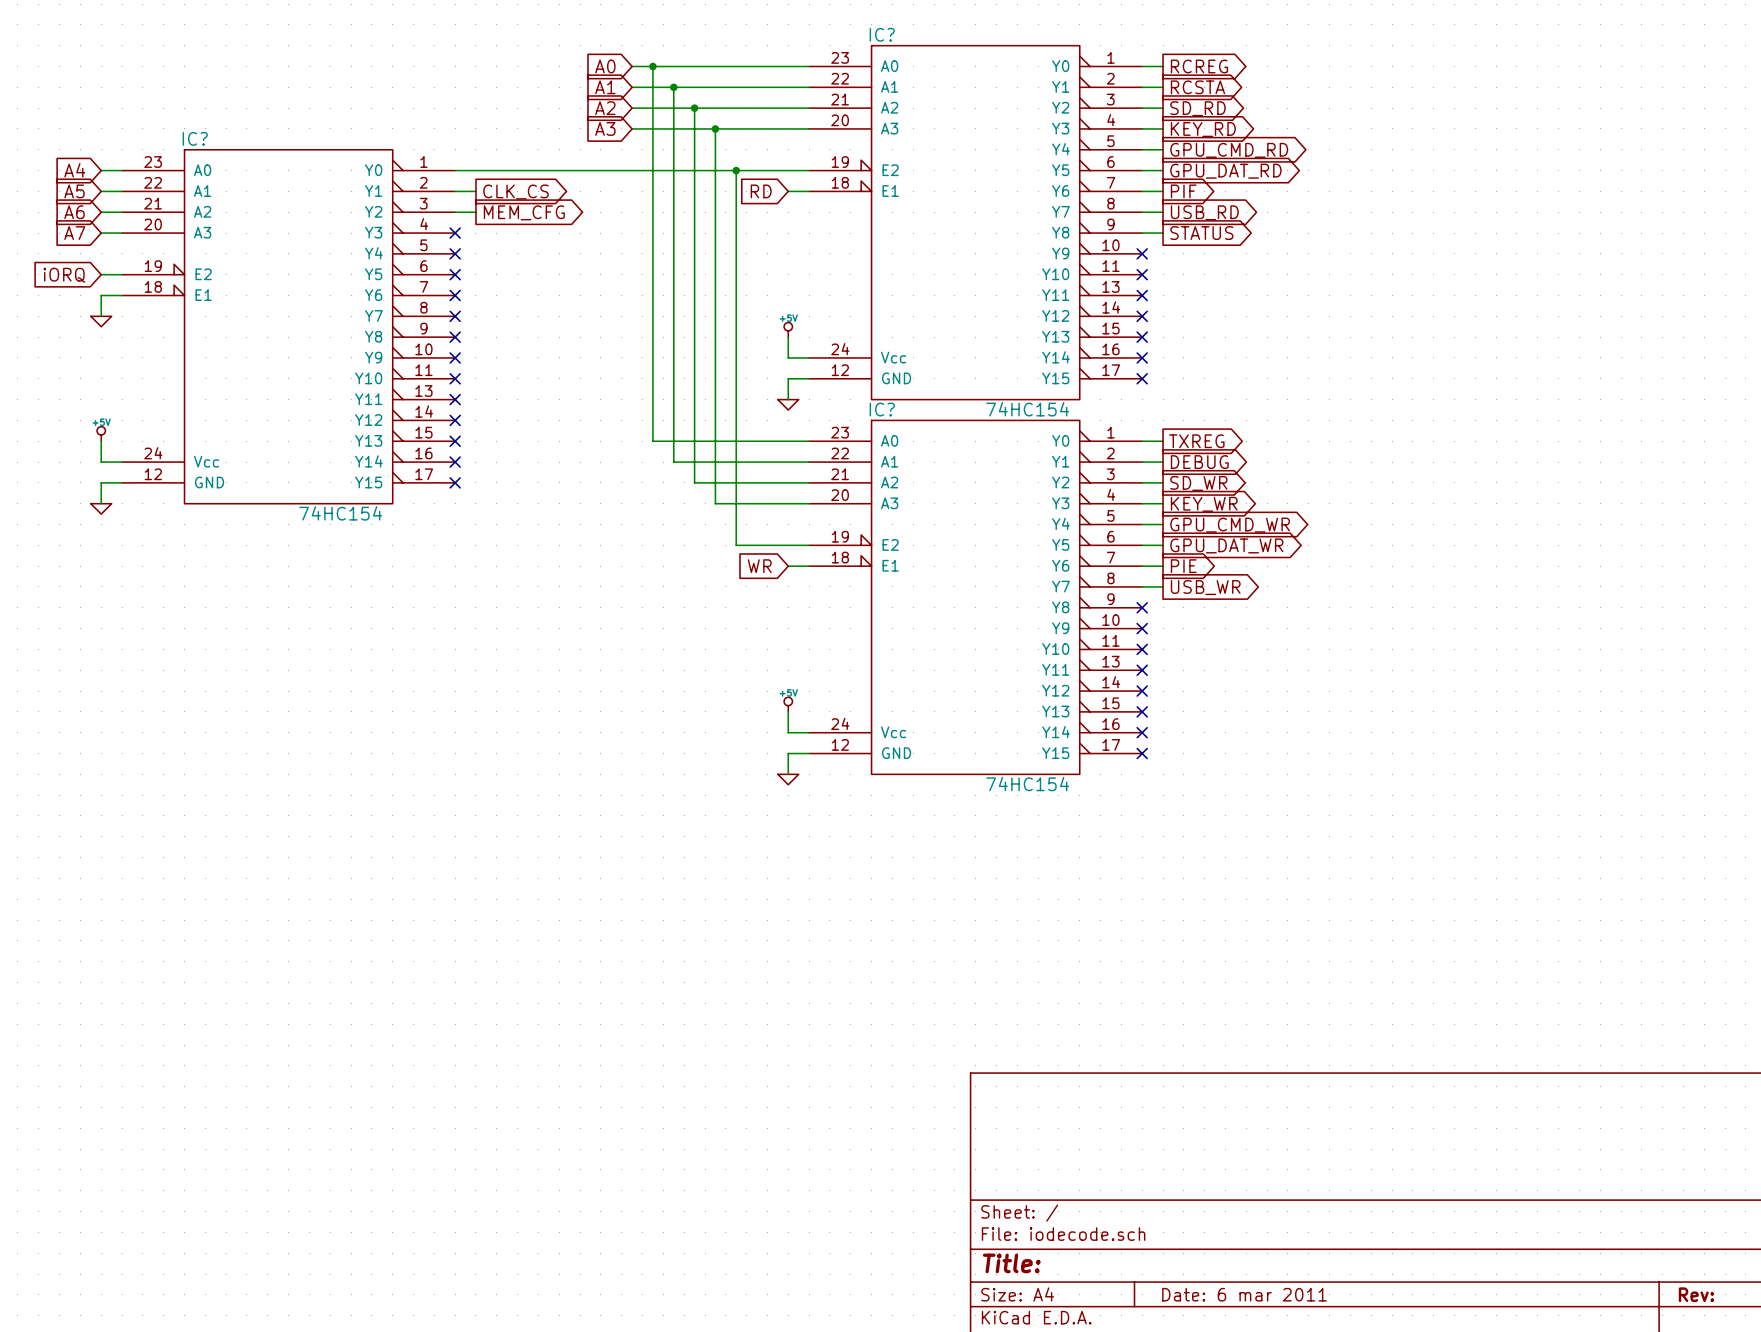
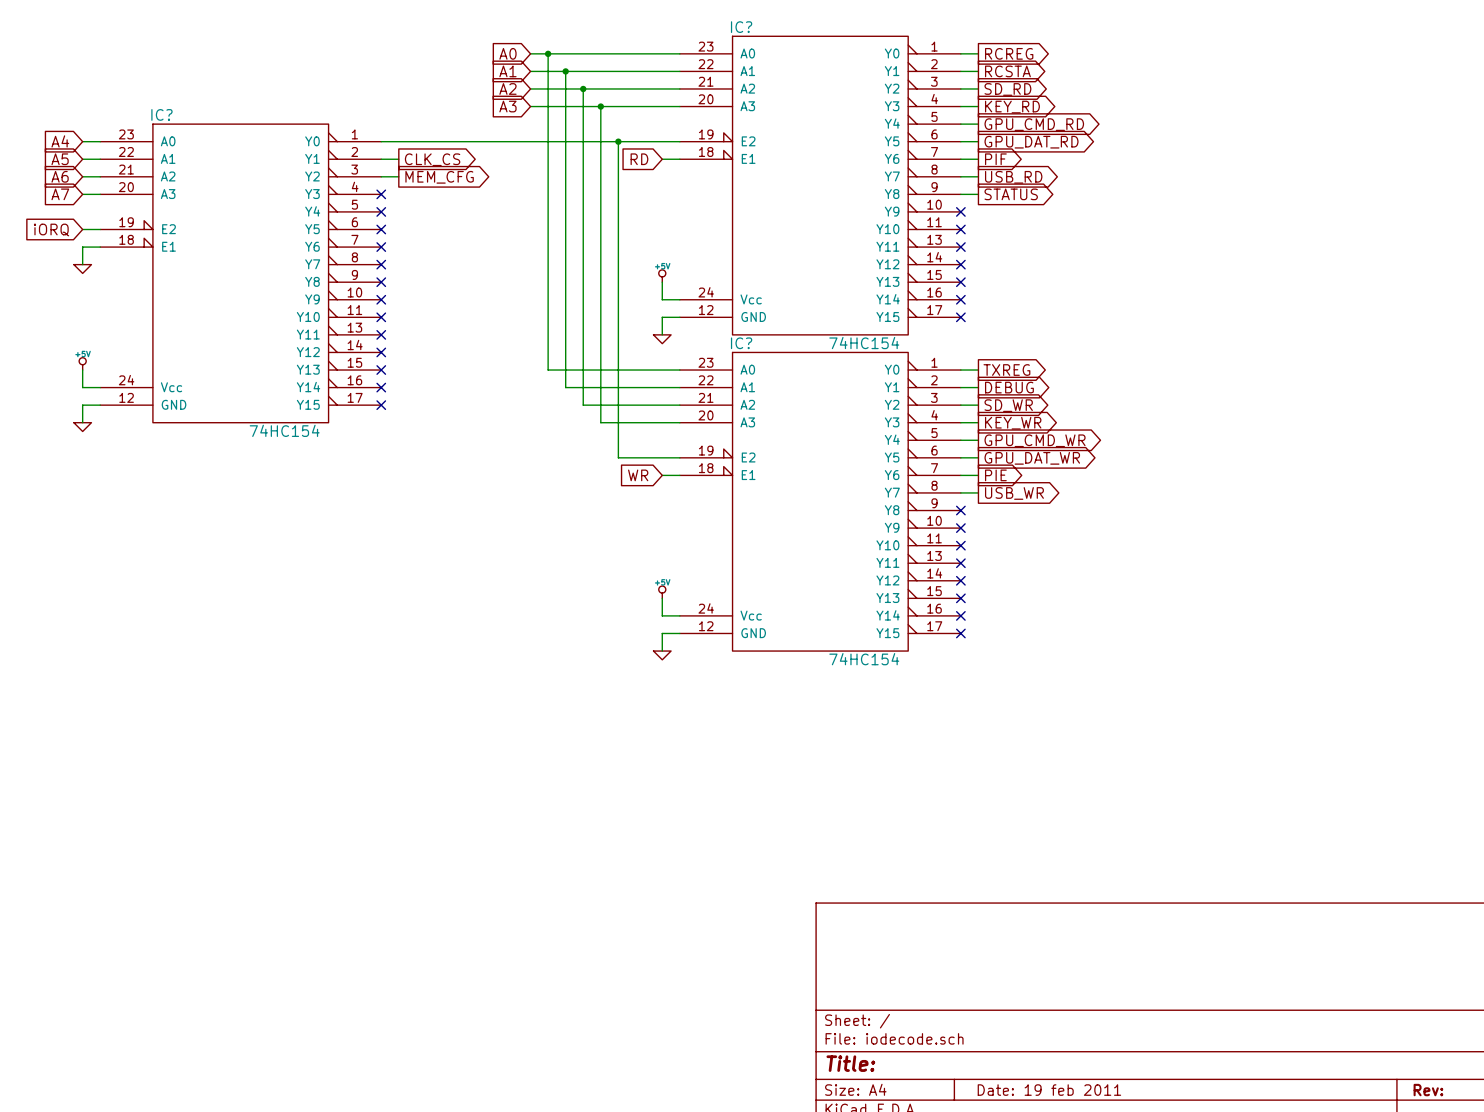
title block: Date: 6 mar 2011 (1244, 1294) -> Date: 19 feb 2011 (1049, 1090)

